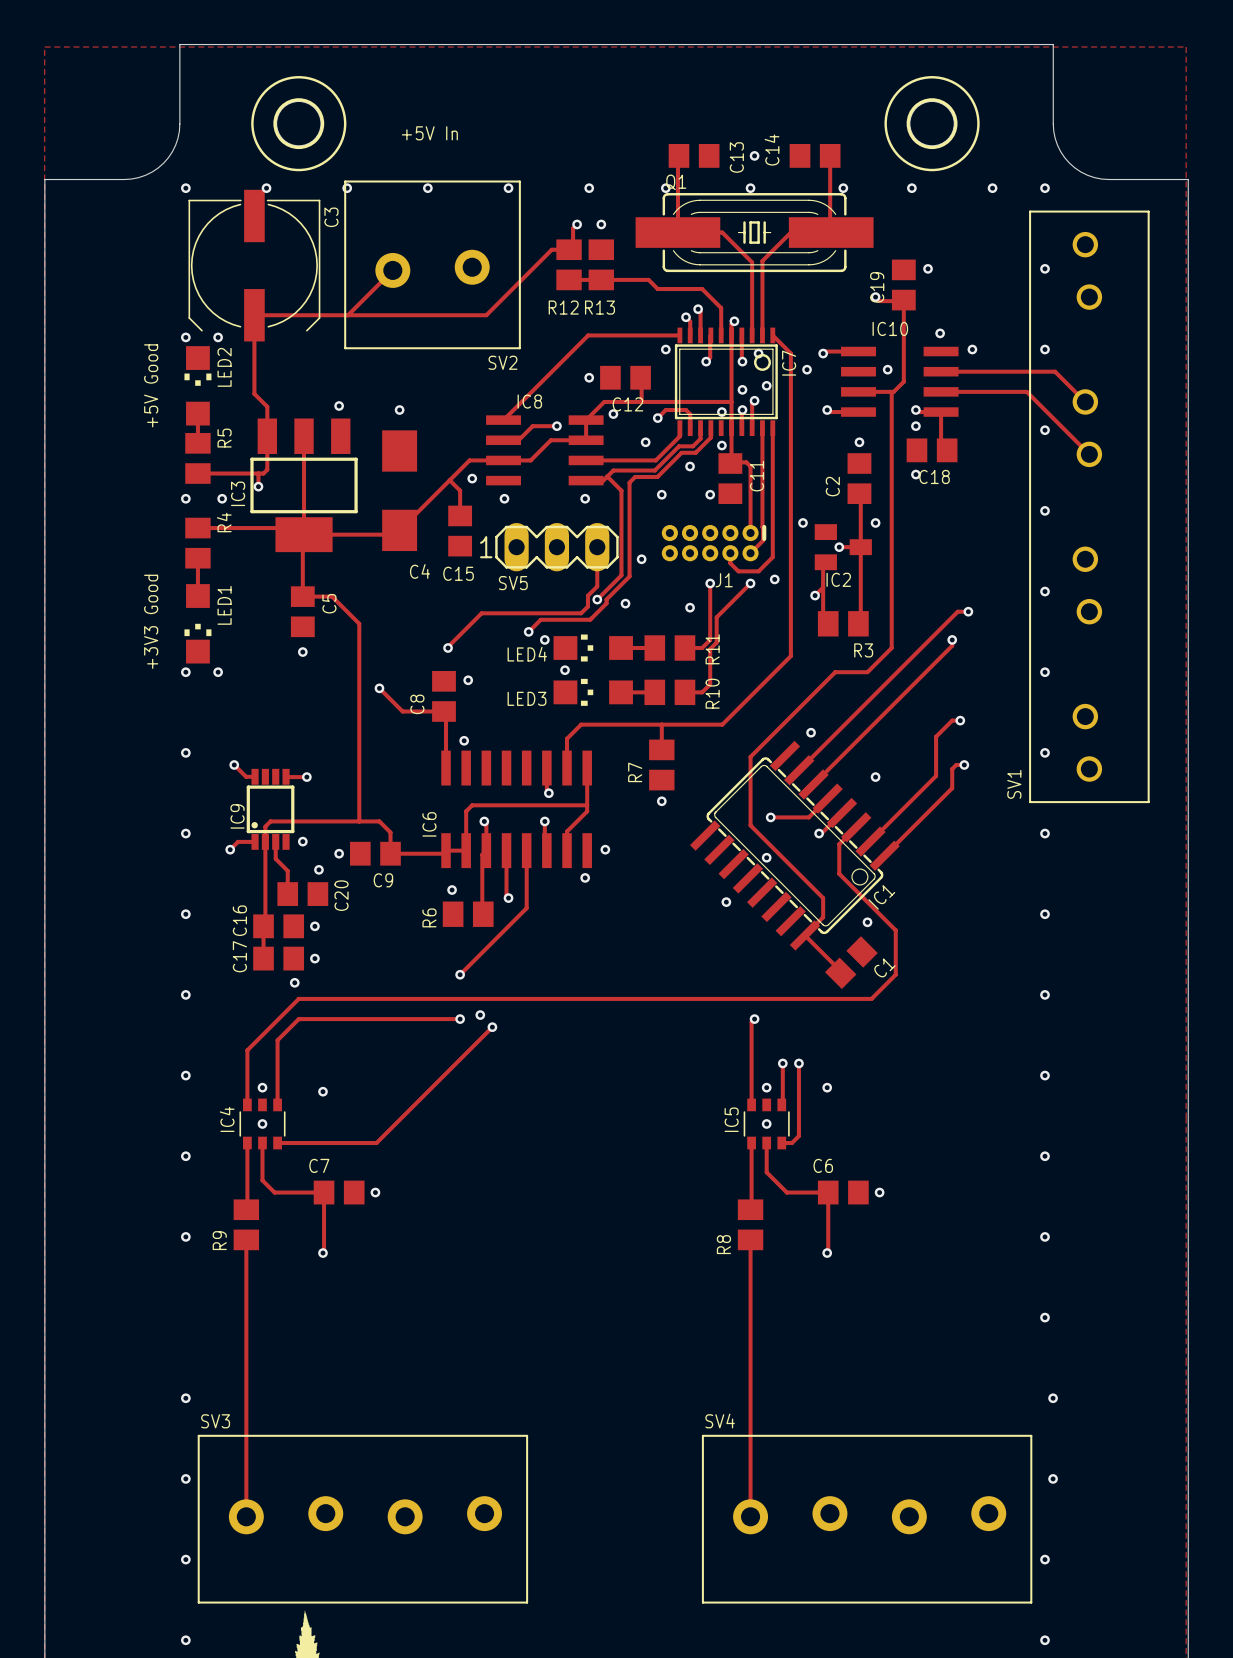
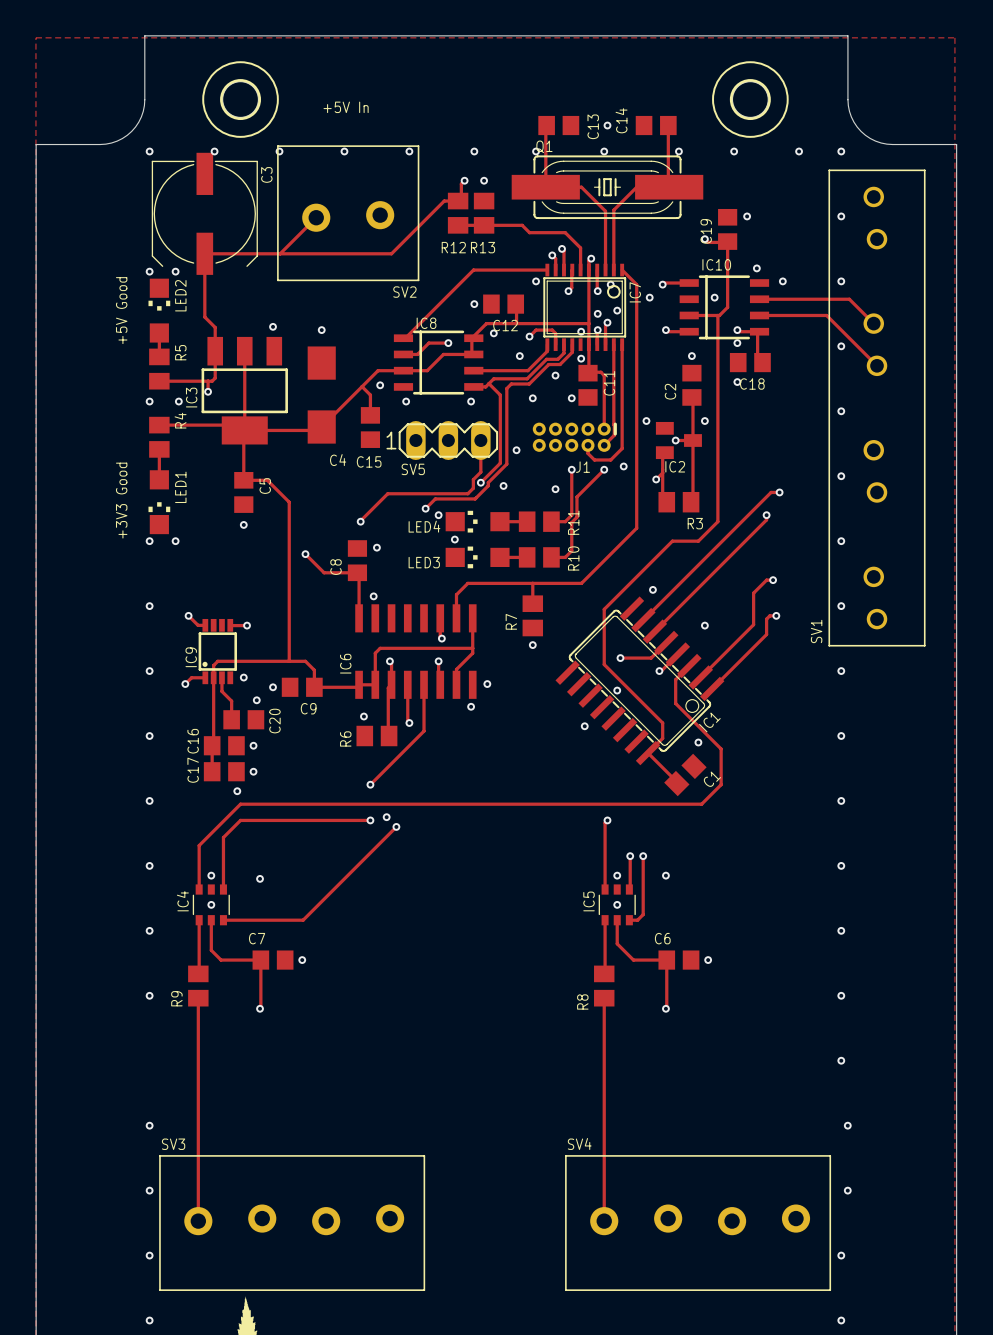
IC10 footprint: [841, 346, 959, 417] -> [679, 275, 770, 340]
IC8 footprint: [486, 415, 604, 486] -> [393, 330, 484, 395]

